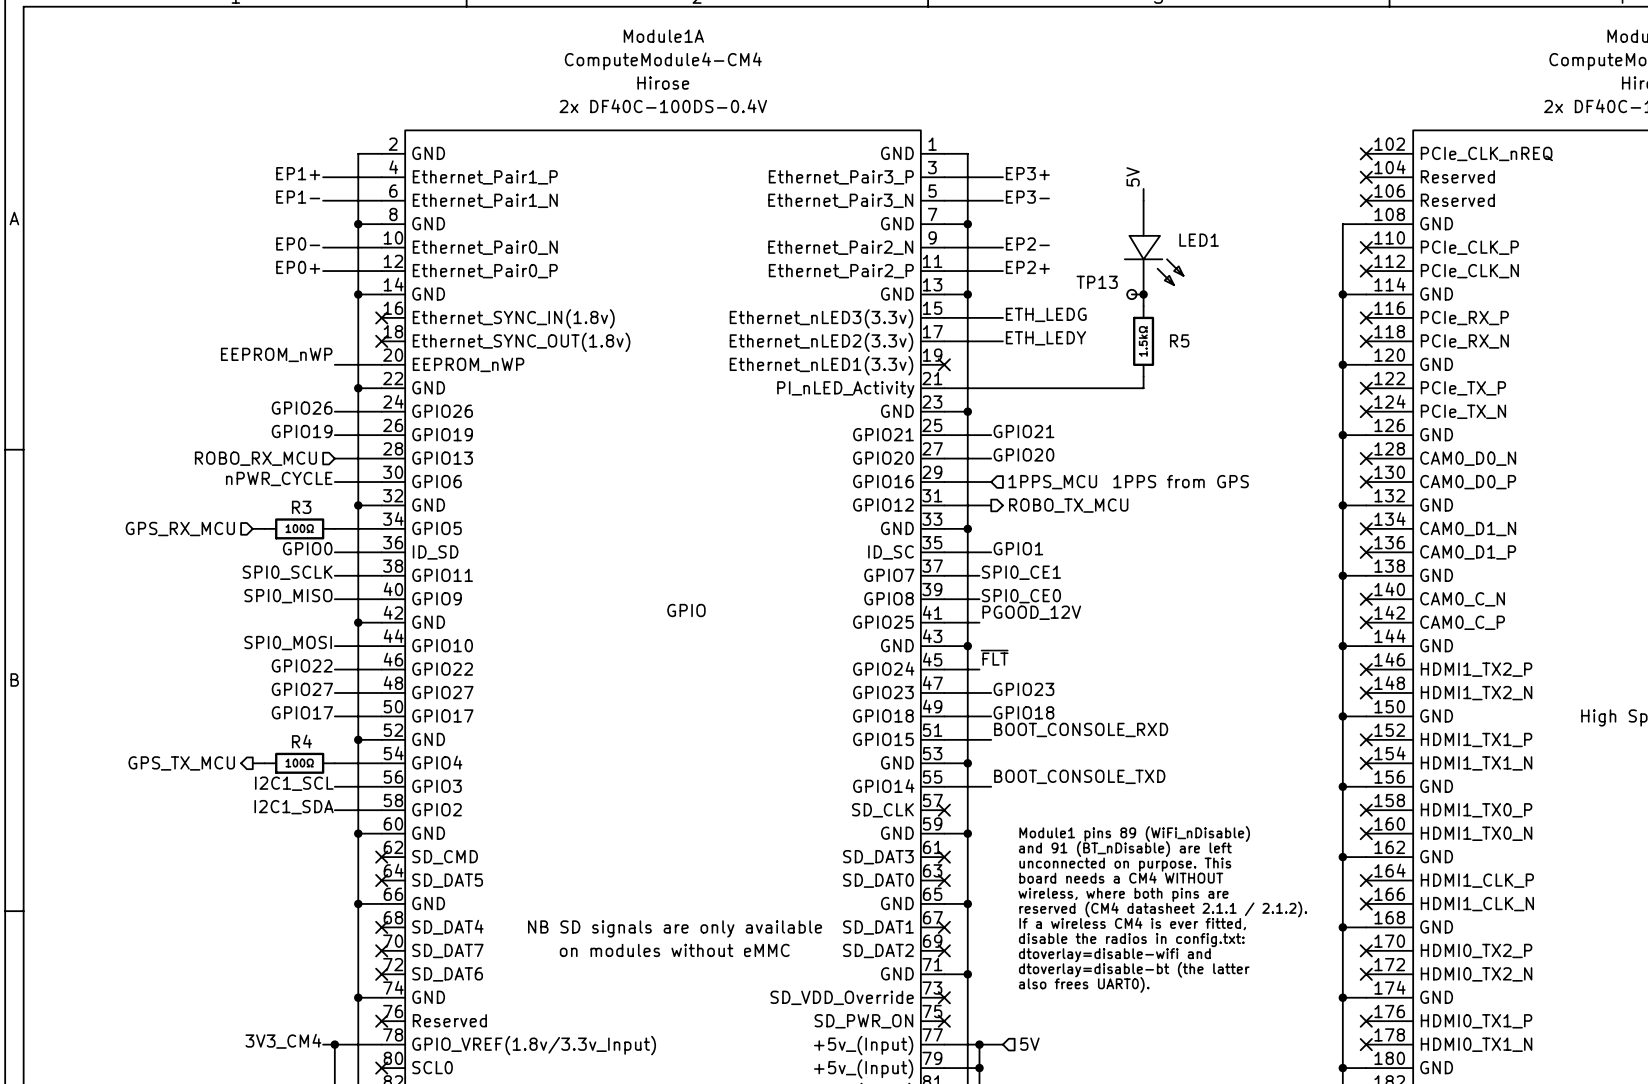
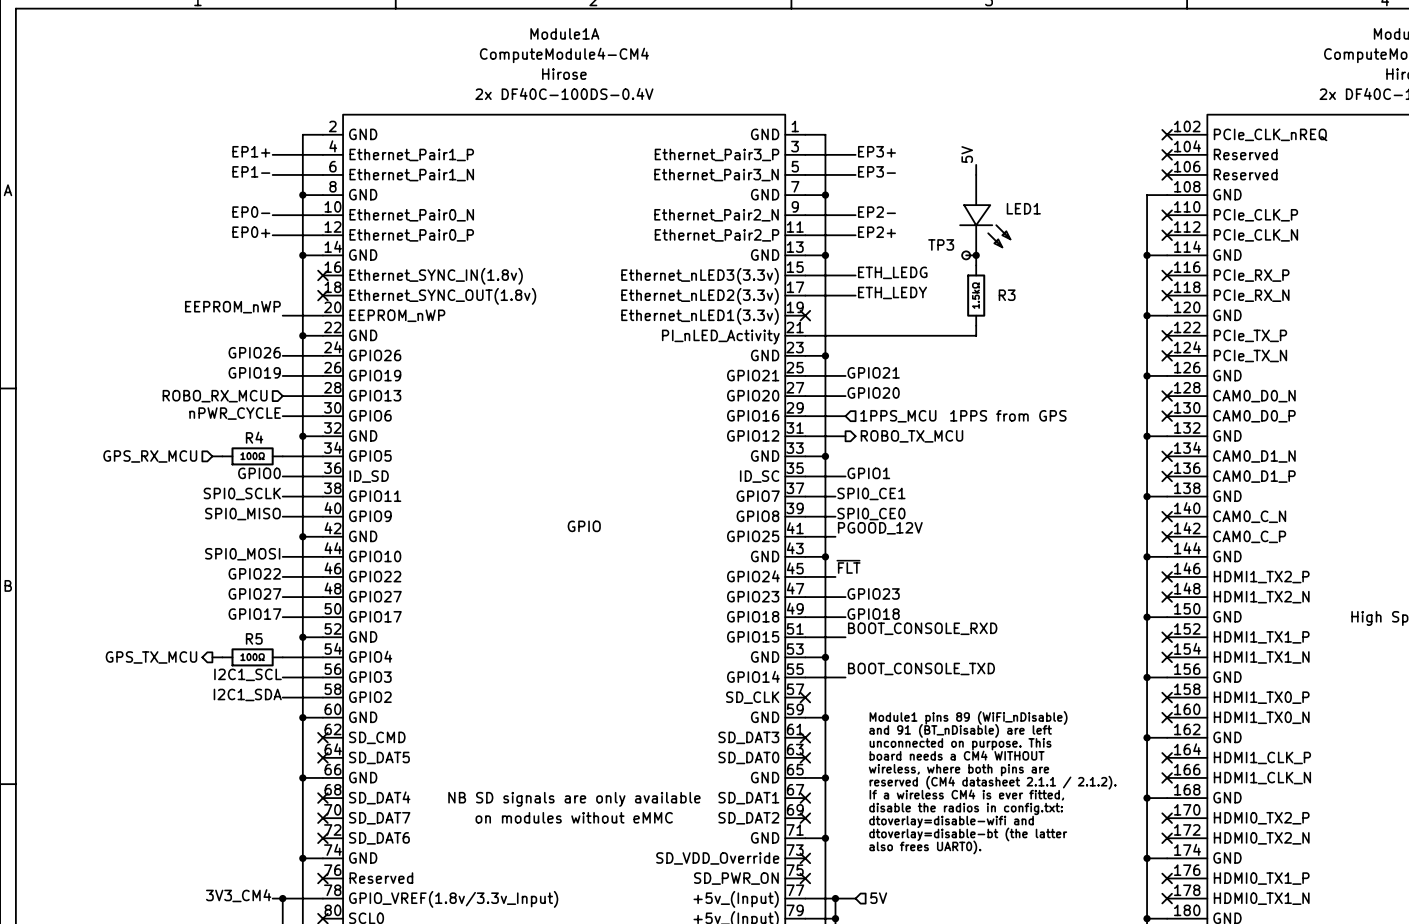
TP13 name: TP13 (1097, 282) -> TP3 (941, 244)
R5 name: R5 (1179, 340) -> R3 (1007, 295)
R3 name: R3 (301, 507) -> R4 (254, 437)
R4 name: R4 (301, 741) -> R5 (254, 638)

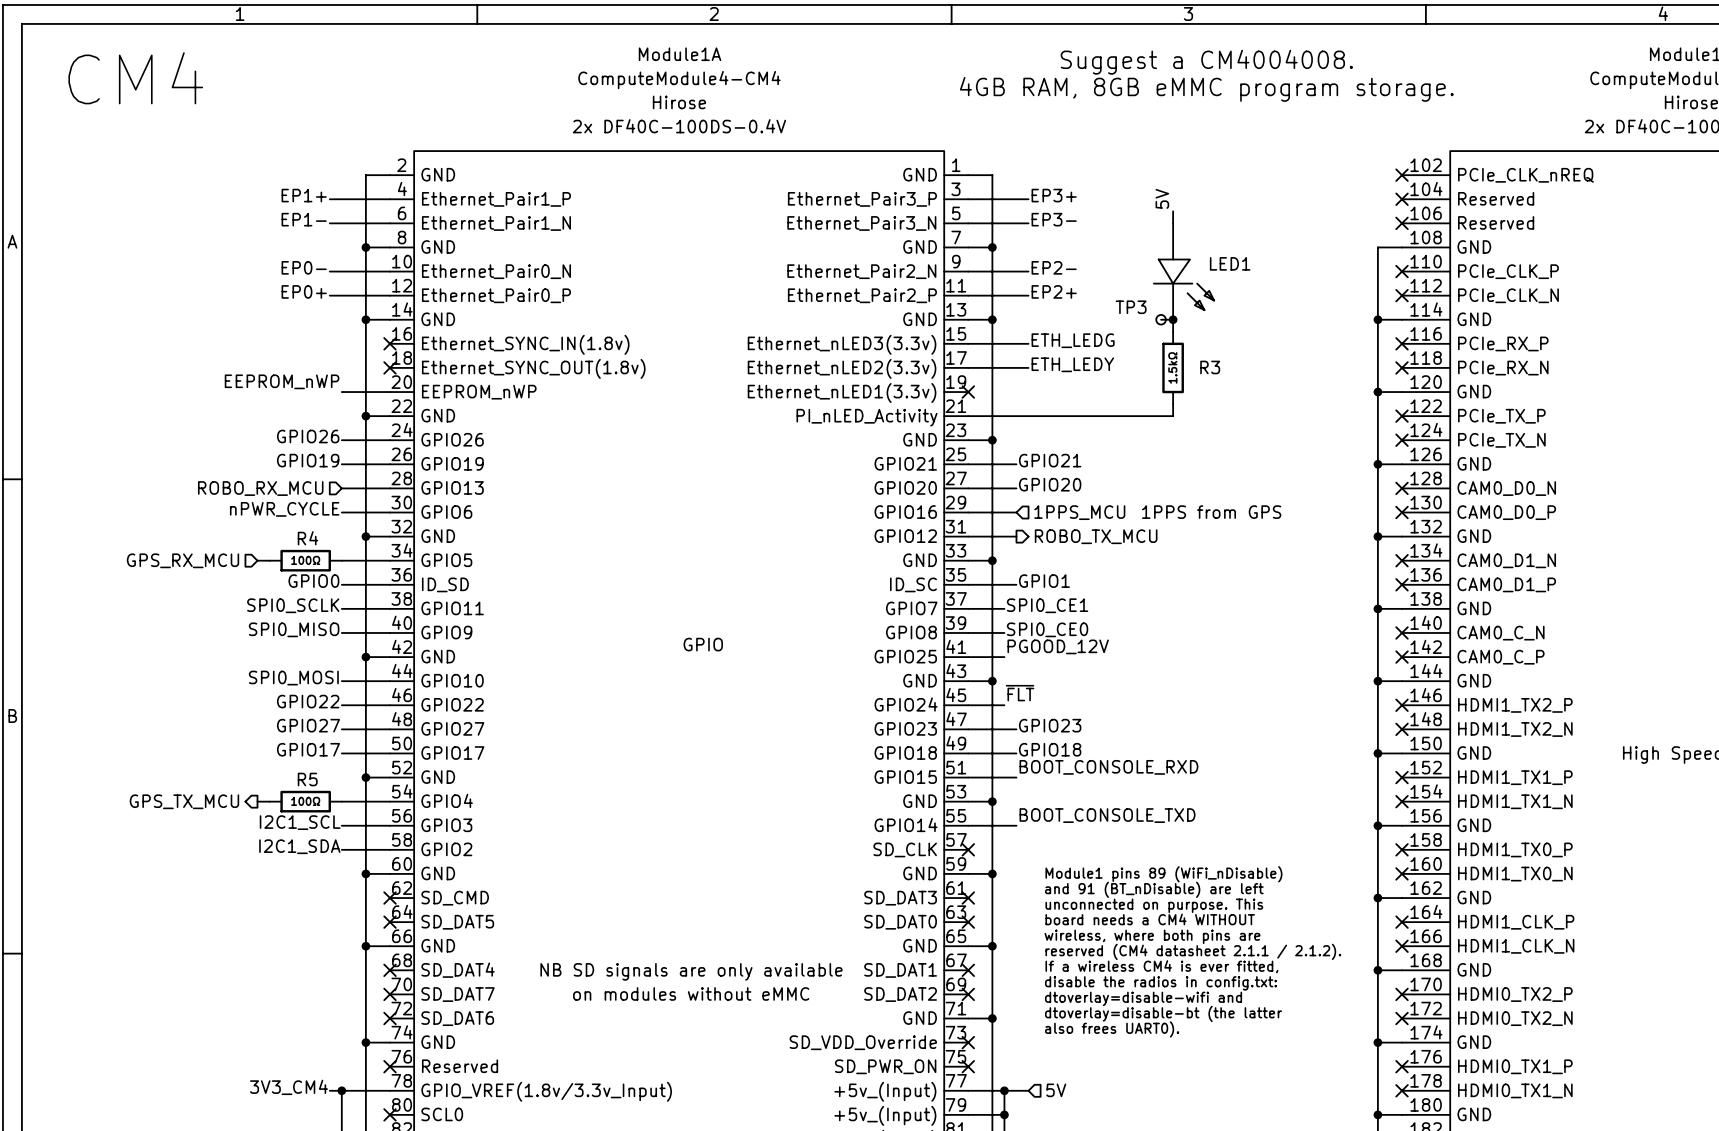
text: none -> Suggest a CM4004008. (1206, 62)
text: none -> CM4 (135, 78)
text: none -> 4GB RAM, 8GB eMMC program storage. (1206, 89)

